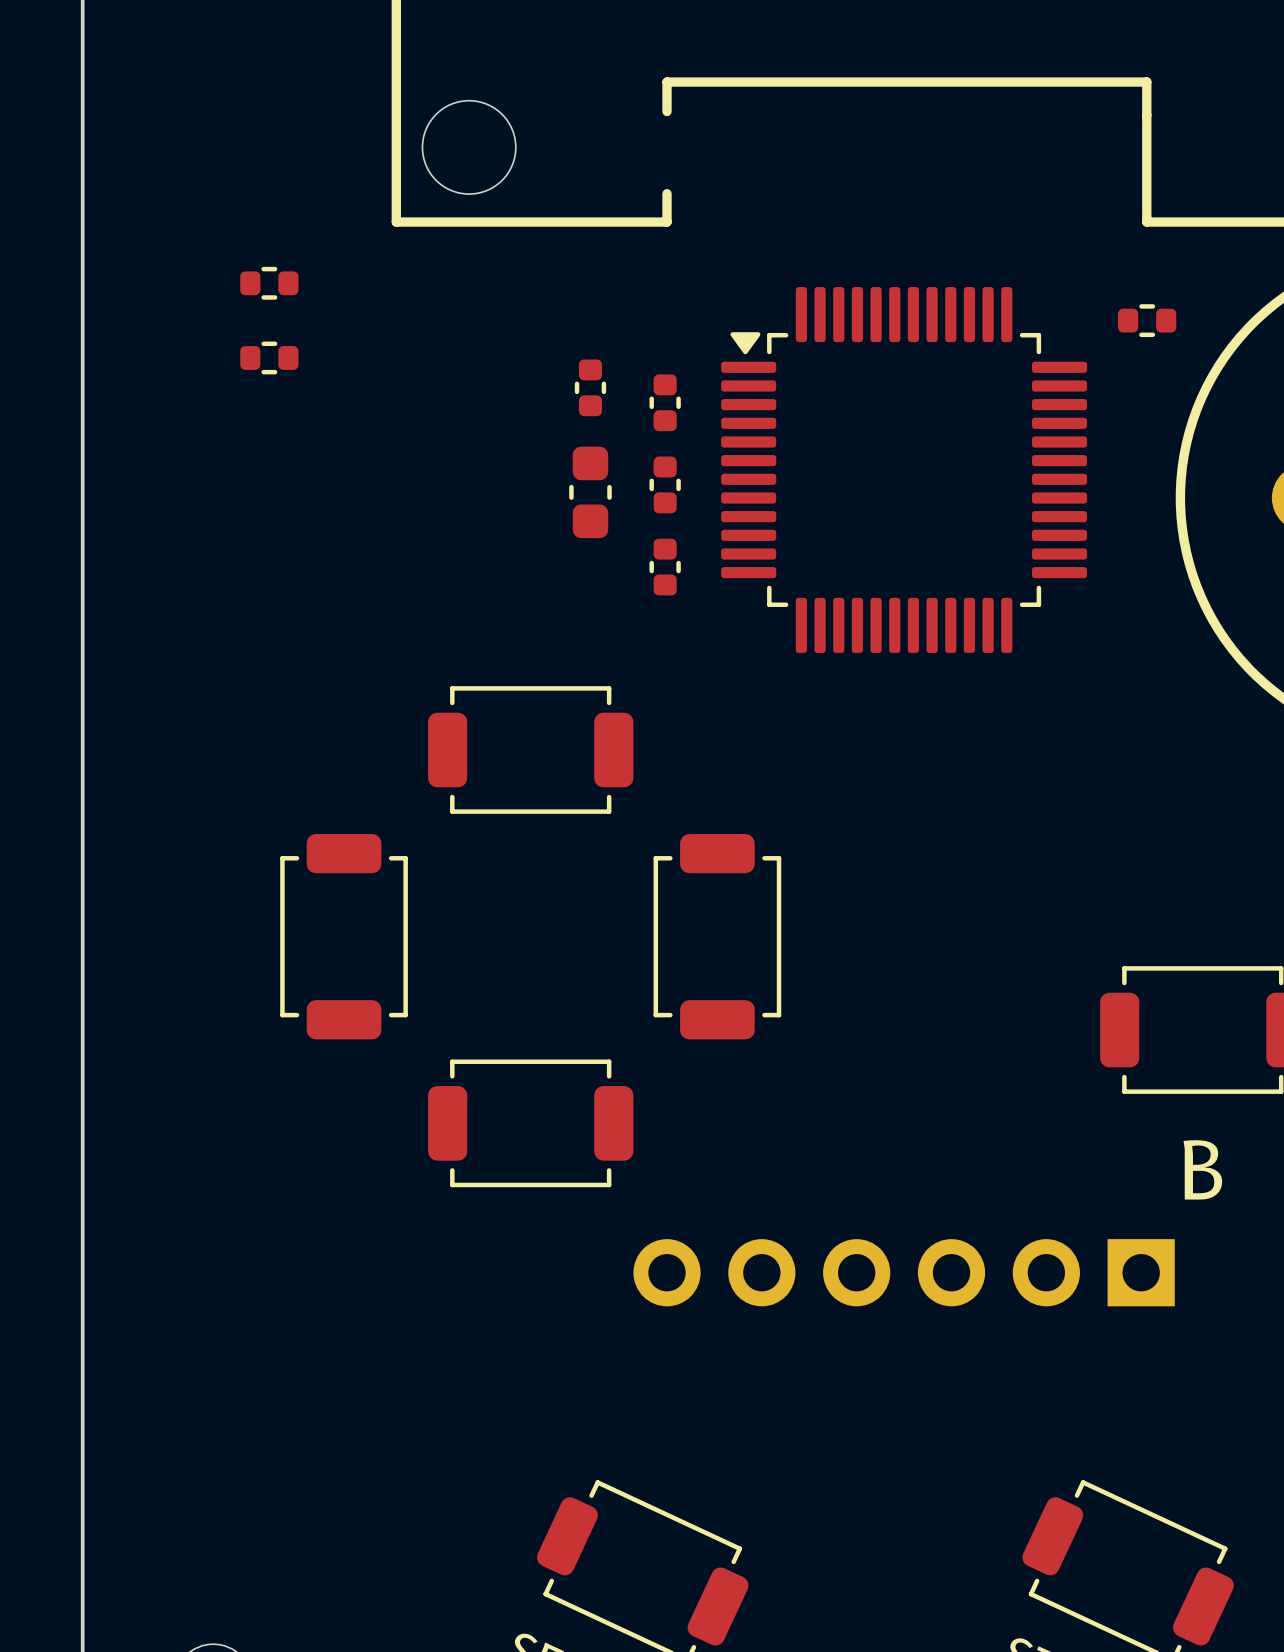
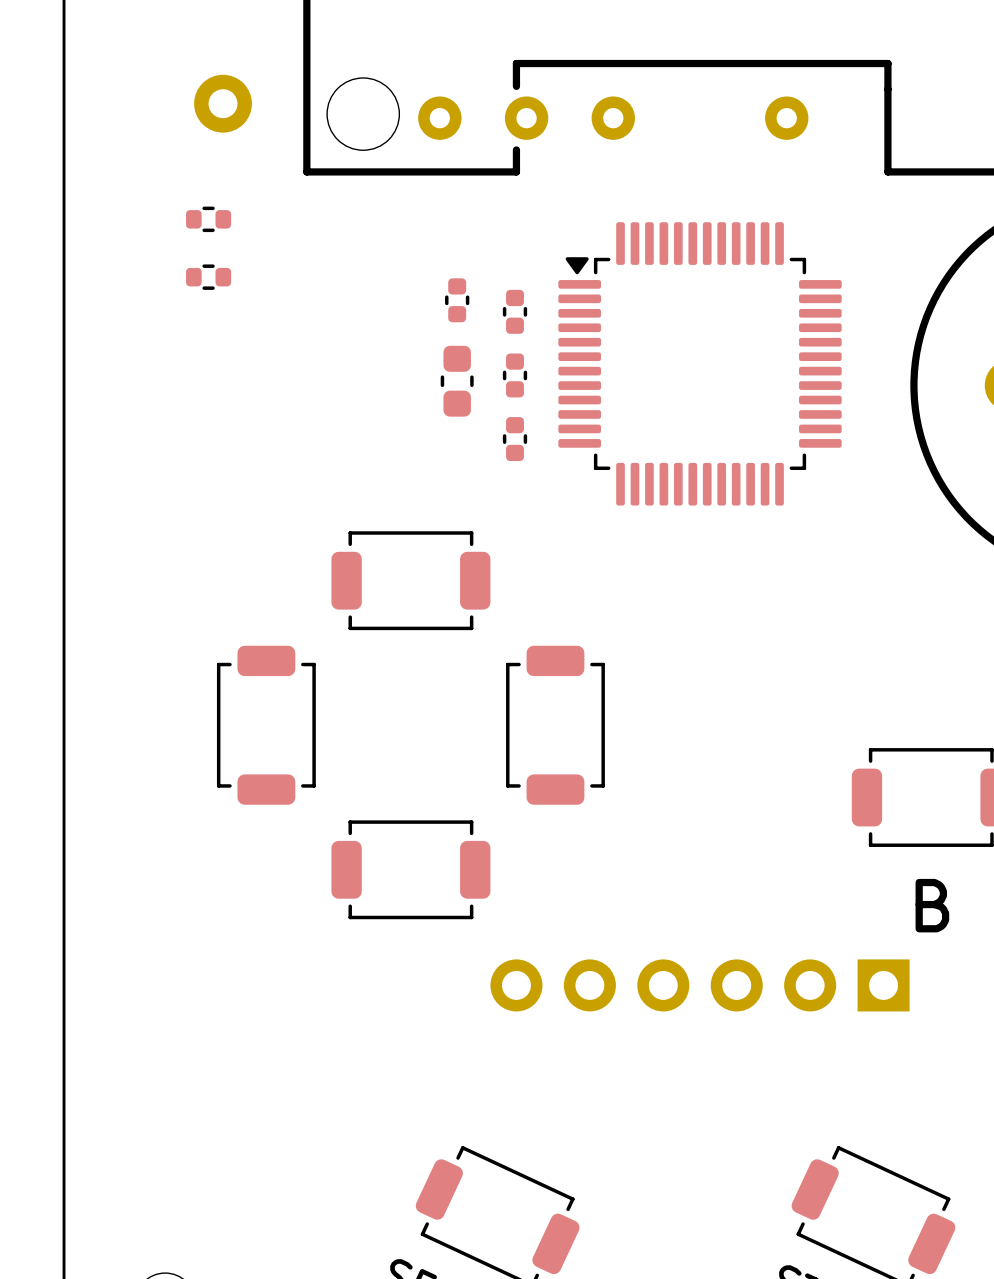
part: none -> (223, 103)
part: none -> (439, 118)
part: none -> (526, 118)
part: none -> (613, 118)
part: none -> (786, 118)
part: (1147, 320) -> none

